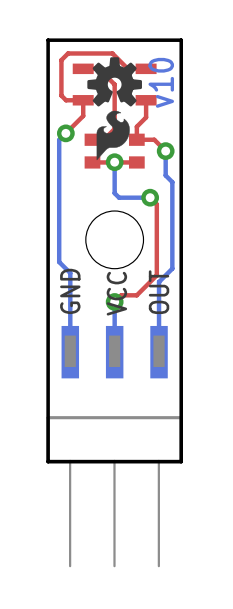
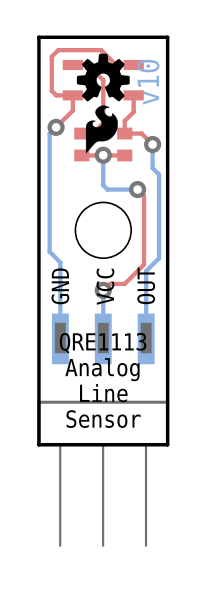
text: none -> QRE1113 (103, 343)
text: none -> Analog (102, 369)
text: none -> Line (103, 393)
text: none -> Sensor (103, 419)

